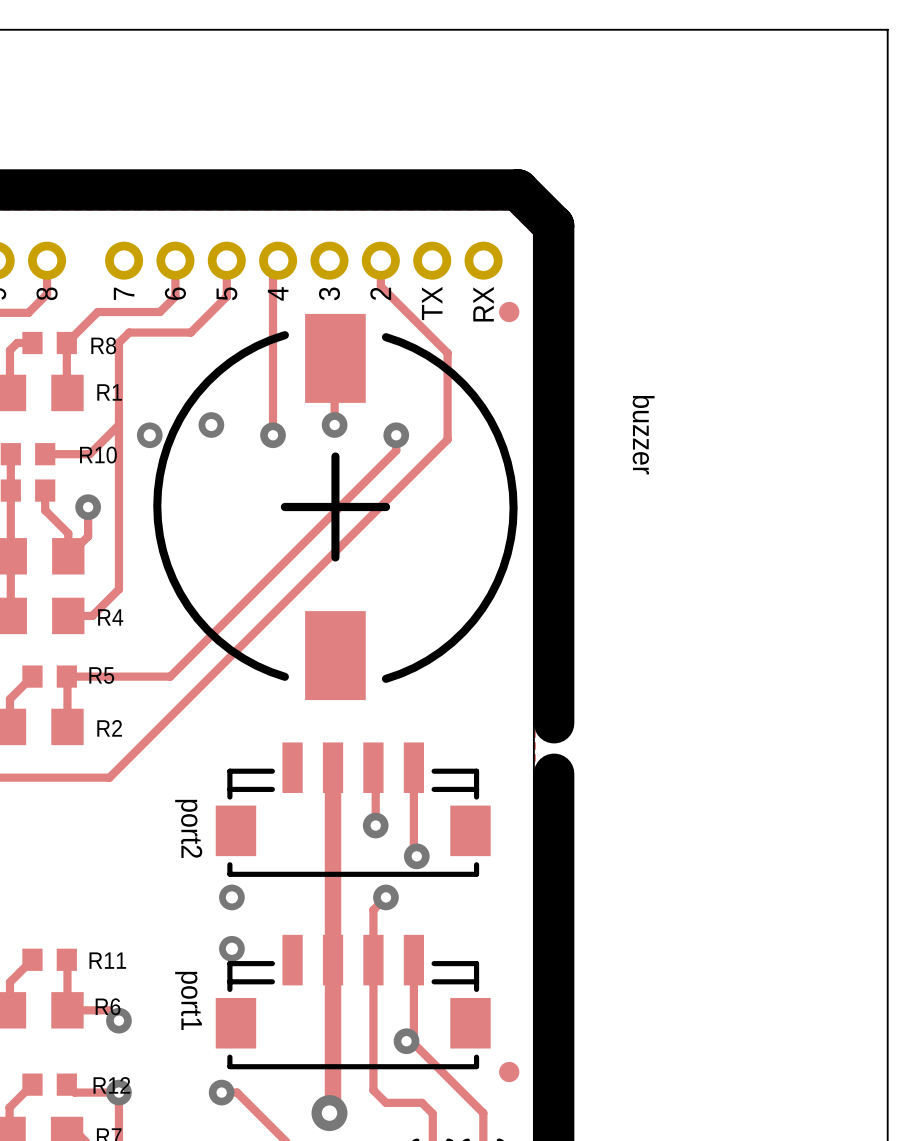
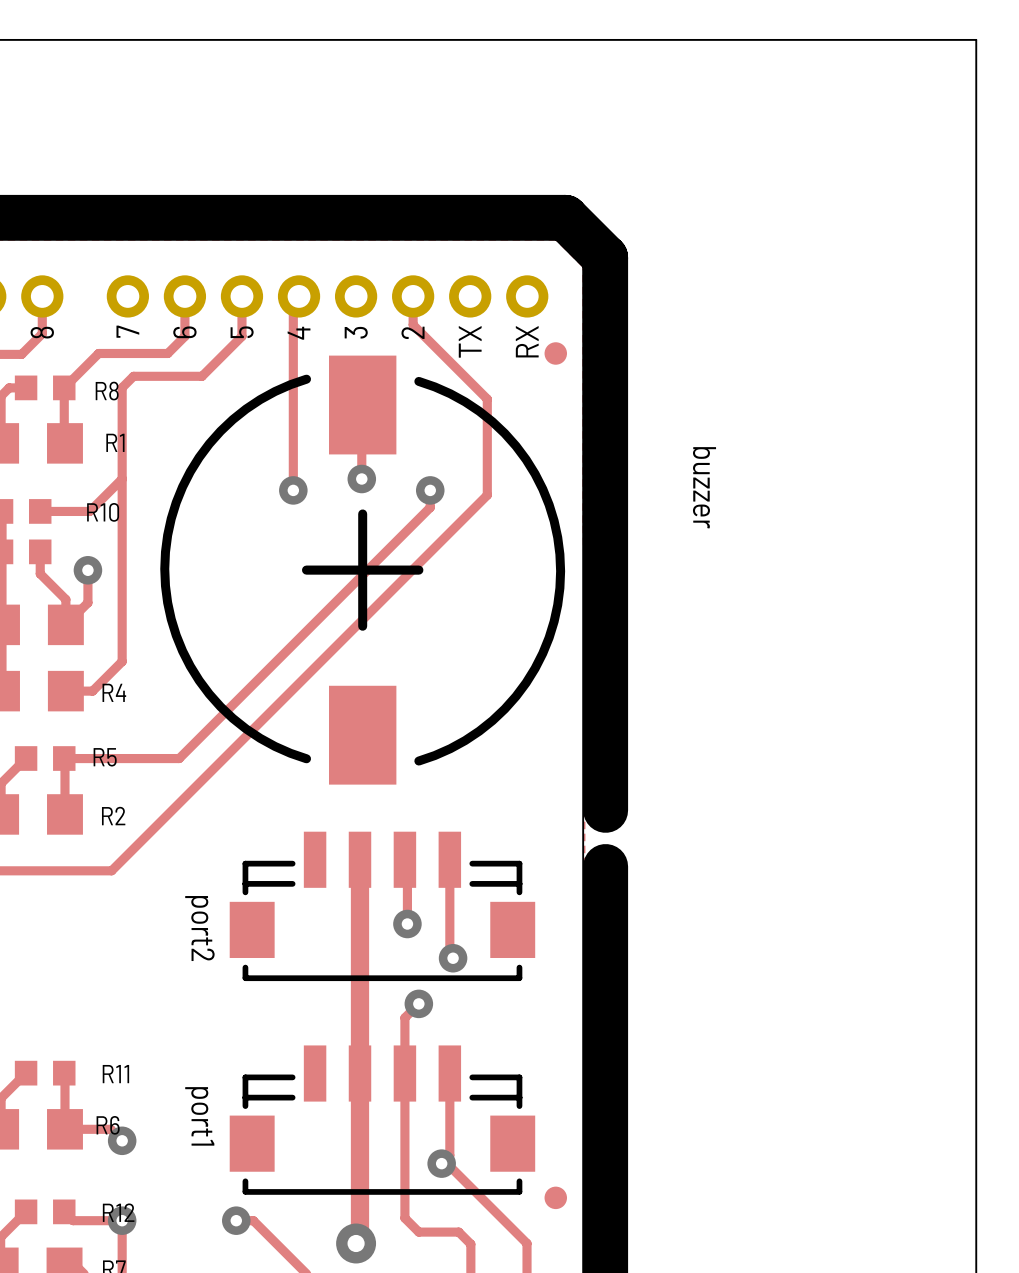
via: (211, 424) -> none
via: (149, 435) -> none
via: (231, 897) -> none
via: (231, 948) -> none

